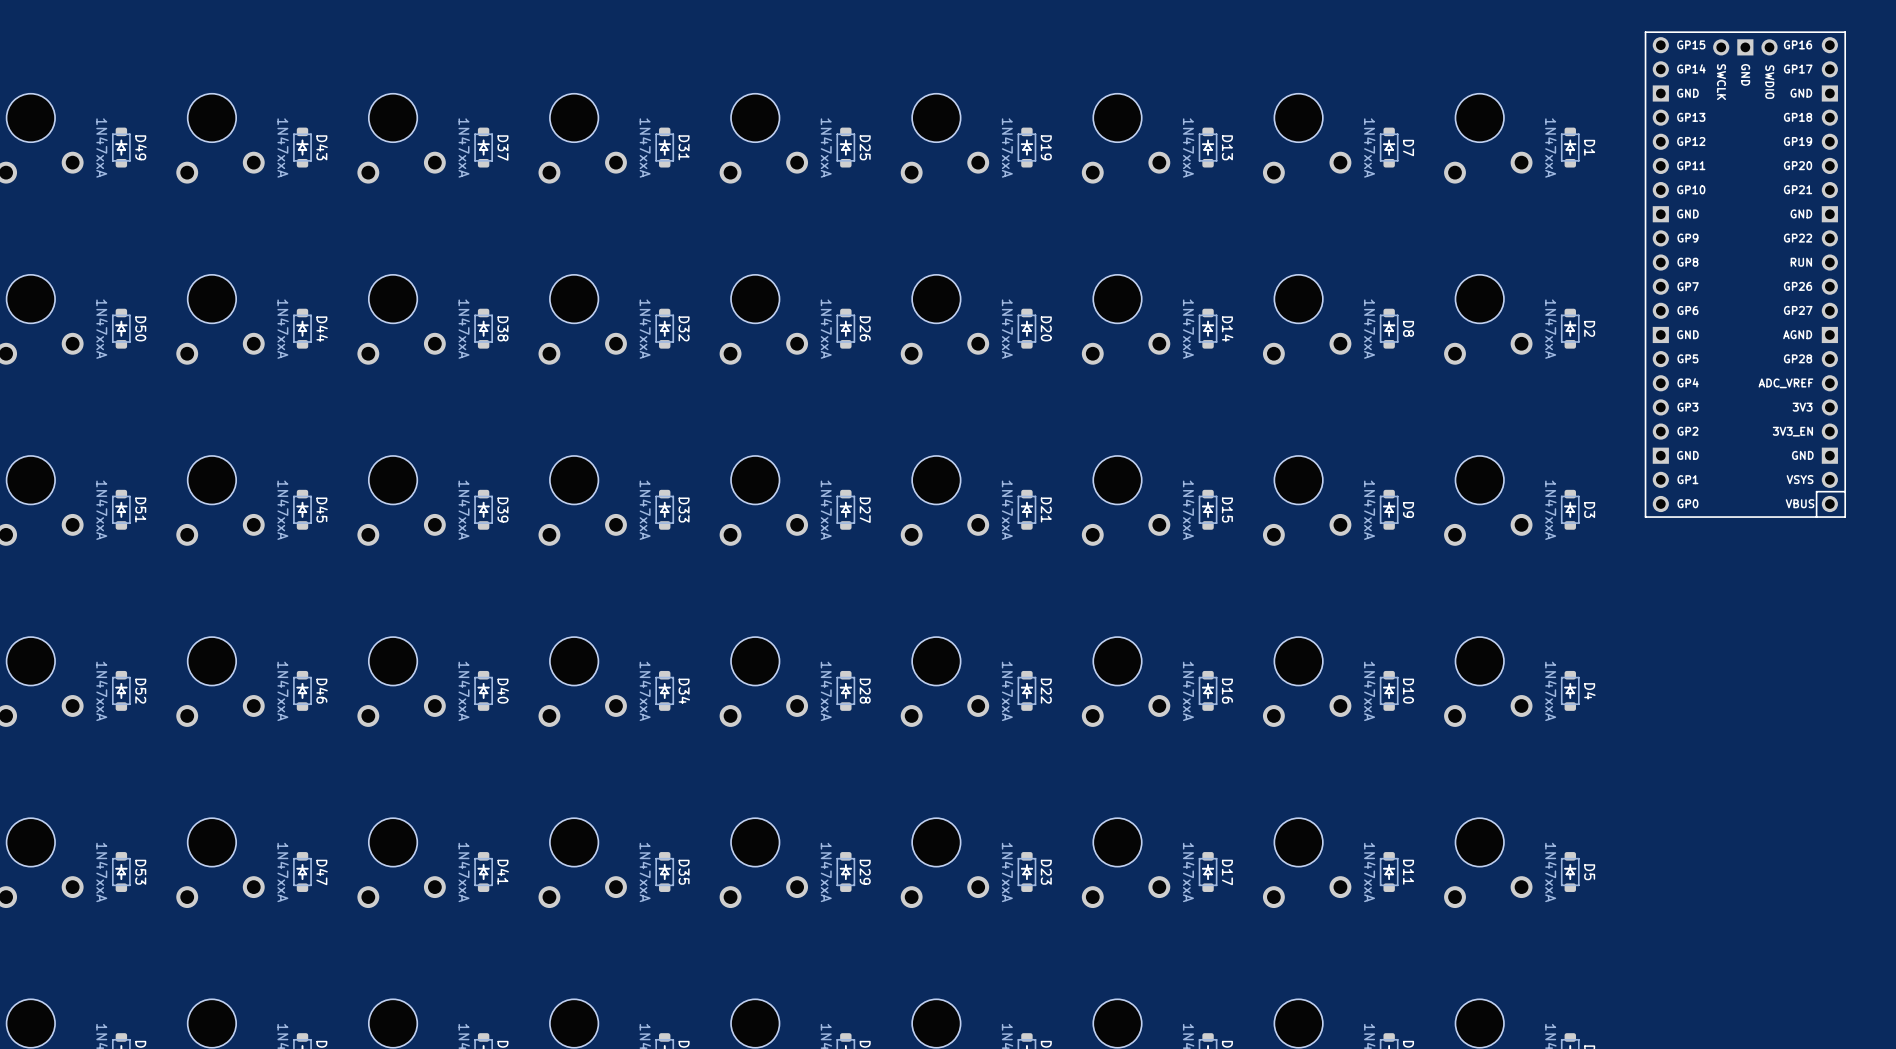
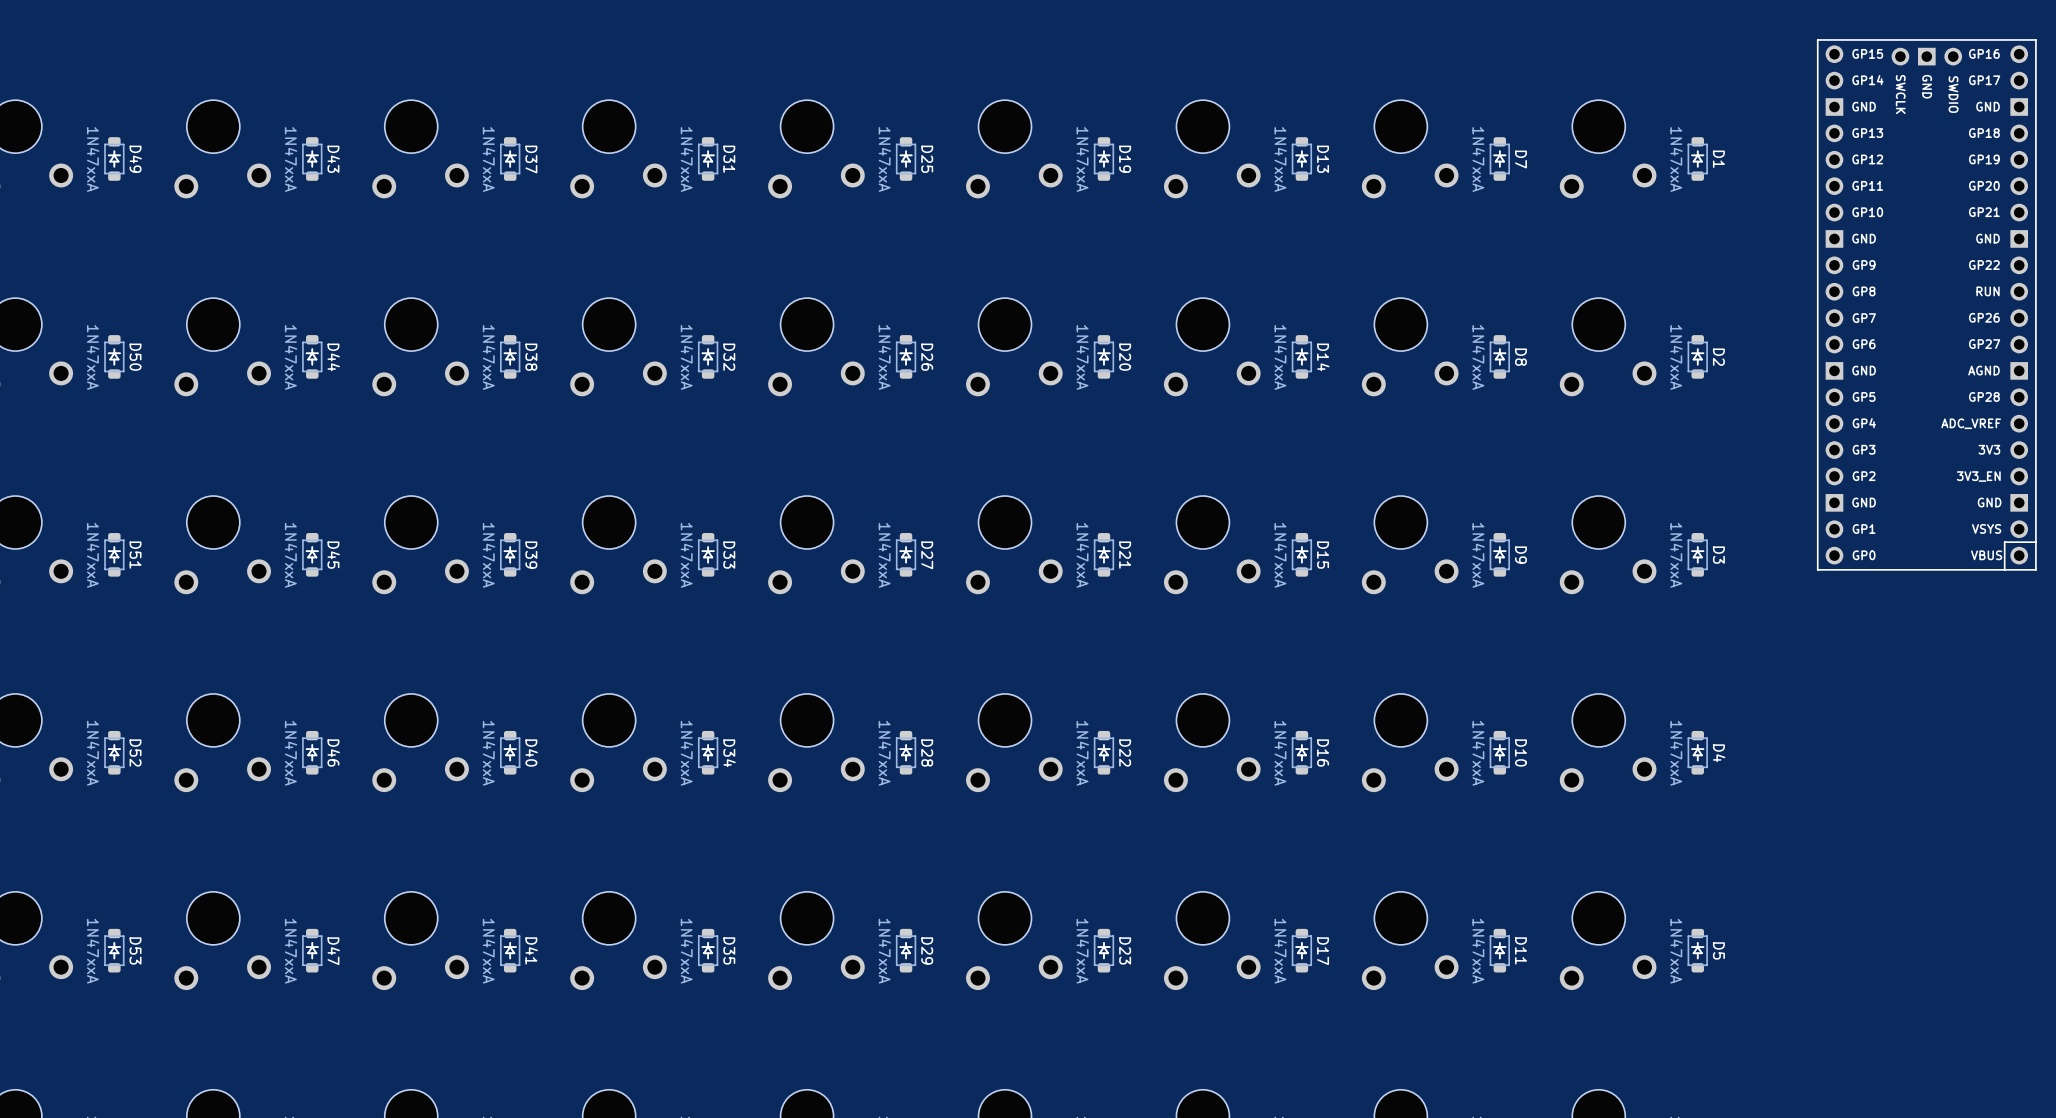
part position: (1745, 274) -> (1926, 304)

